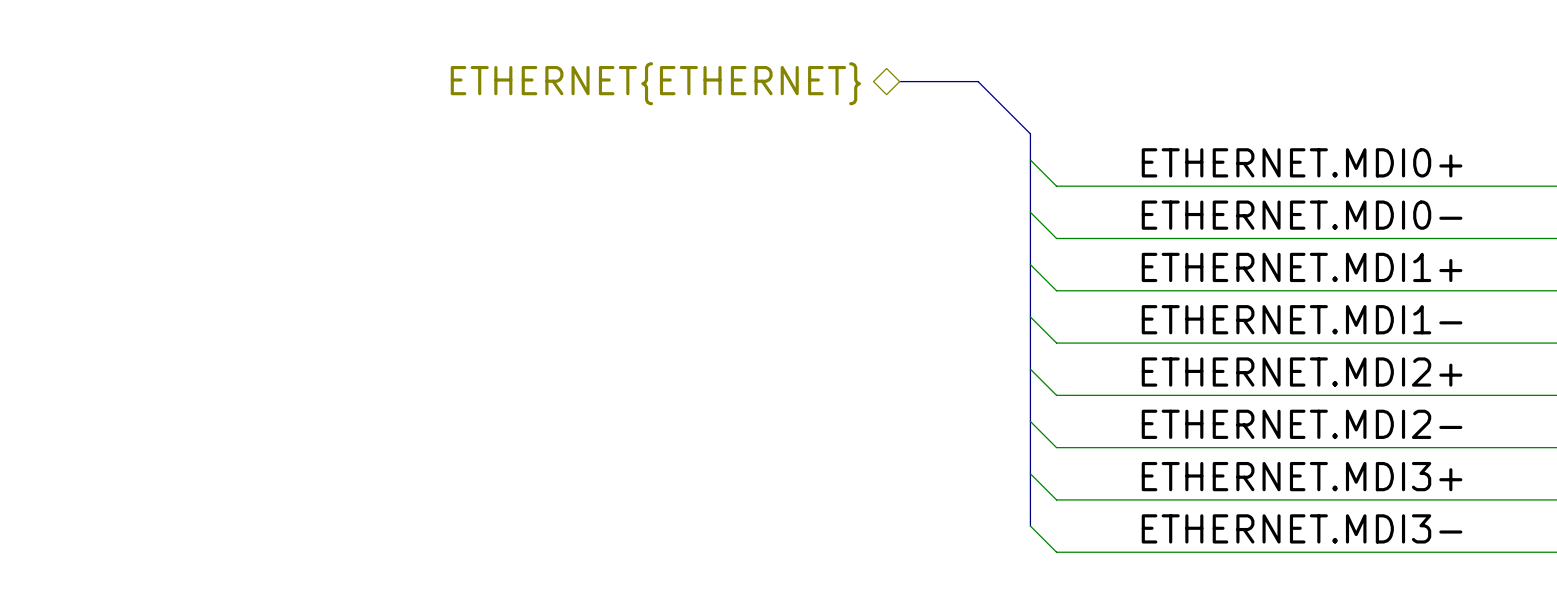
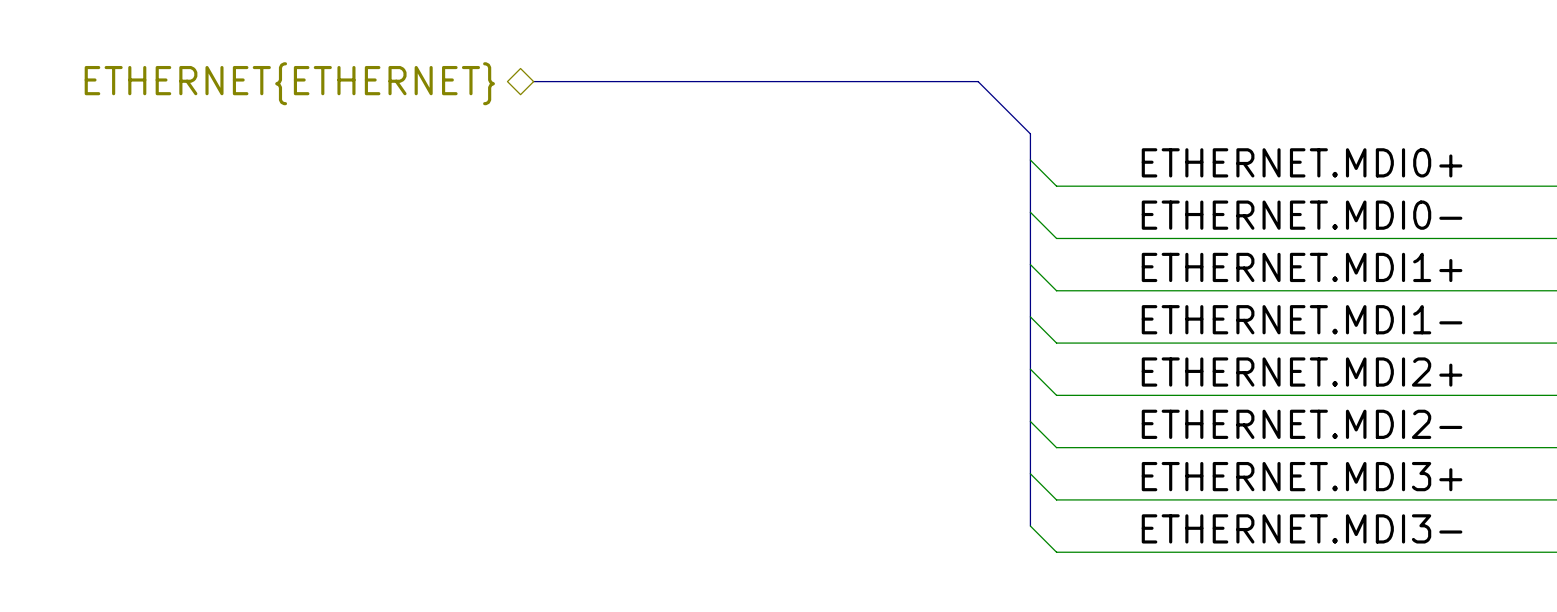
bus: none -> (533, 81) (899, 81)
hierarchical label position: ETHERNET{ETHERNET} (655, 83) -> ETHERNET{ETHERNET} (289, 83)

